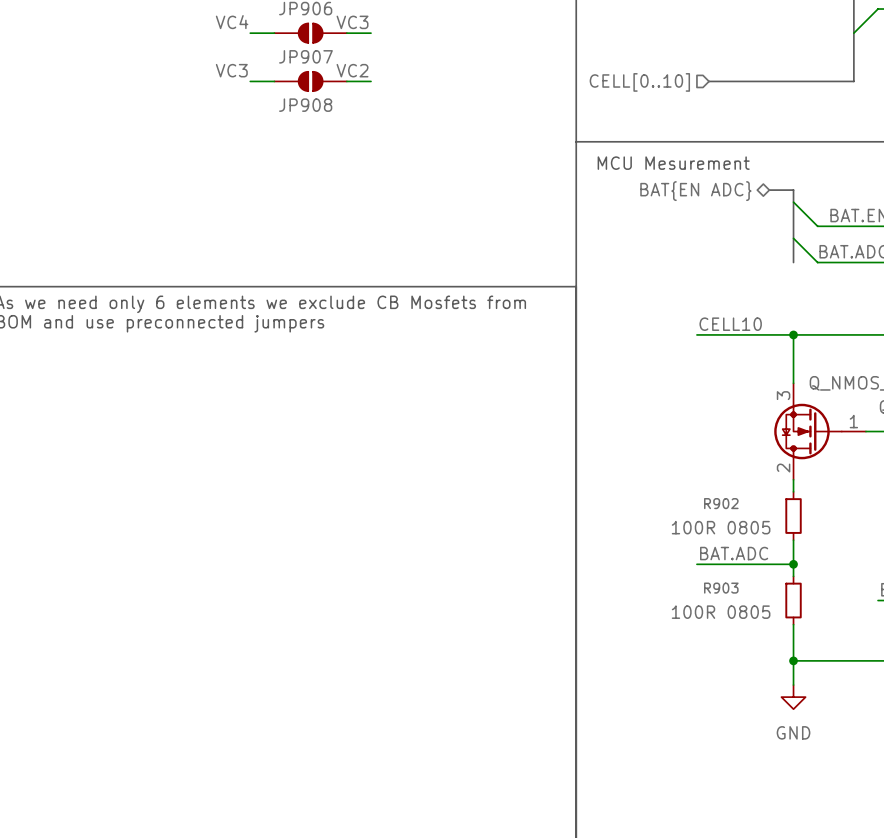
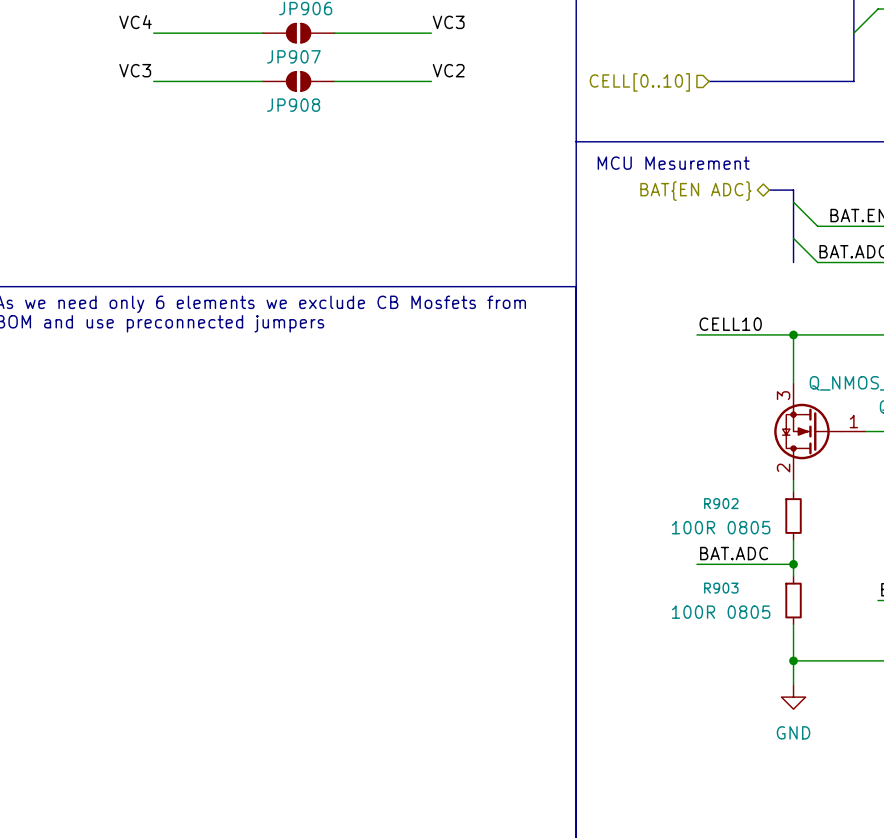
label: none -> VC4 (135, 22)
label: VC4 (232, 22) -> none
label position: VC3 (352, 22) -> VC3 (448, 22)
wire: none -> (153, 33) (250, 33)
JP907 position: (310, 33) -> (298, 33)
wire: none -> (371, 33) (431, 33)
label: none -> VC3 (135, 70)
label: VC3 (231, 70) -> none
label position: VC2 (352, 70) -> VC2 (448, 70)
wire: none -> (153, 81) (250, 81)
JP908 position: (310, 81) -> (298, 81)
wire: none -> (371, 81) (431, 81)

